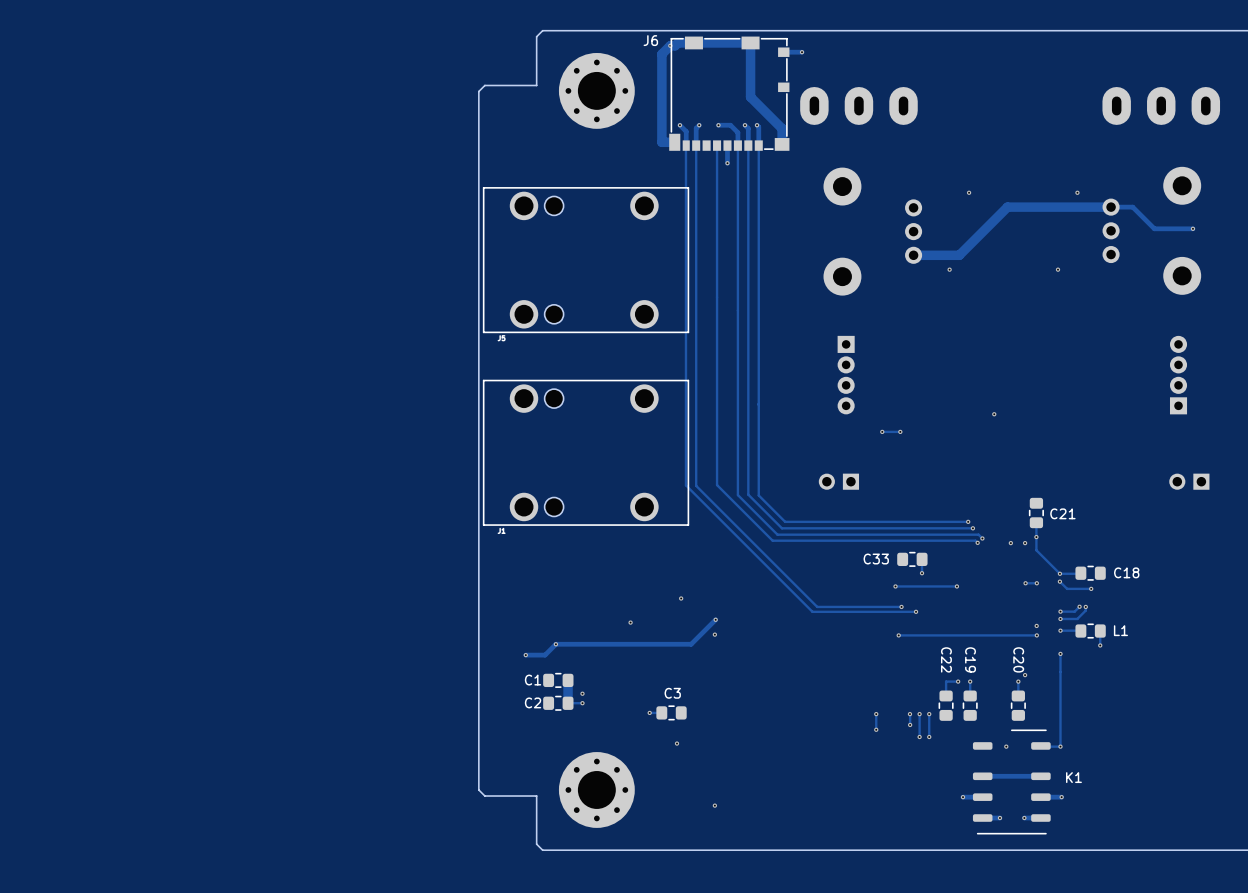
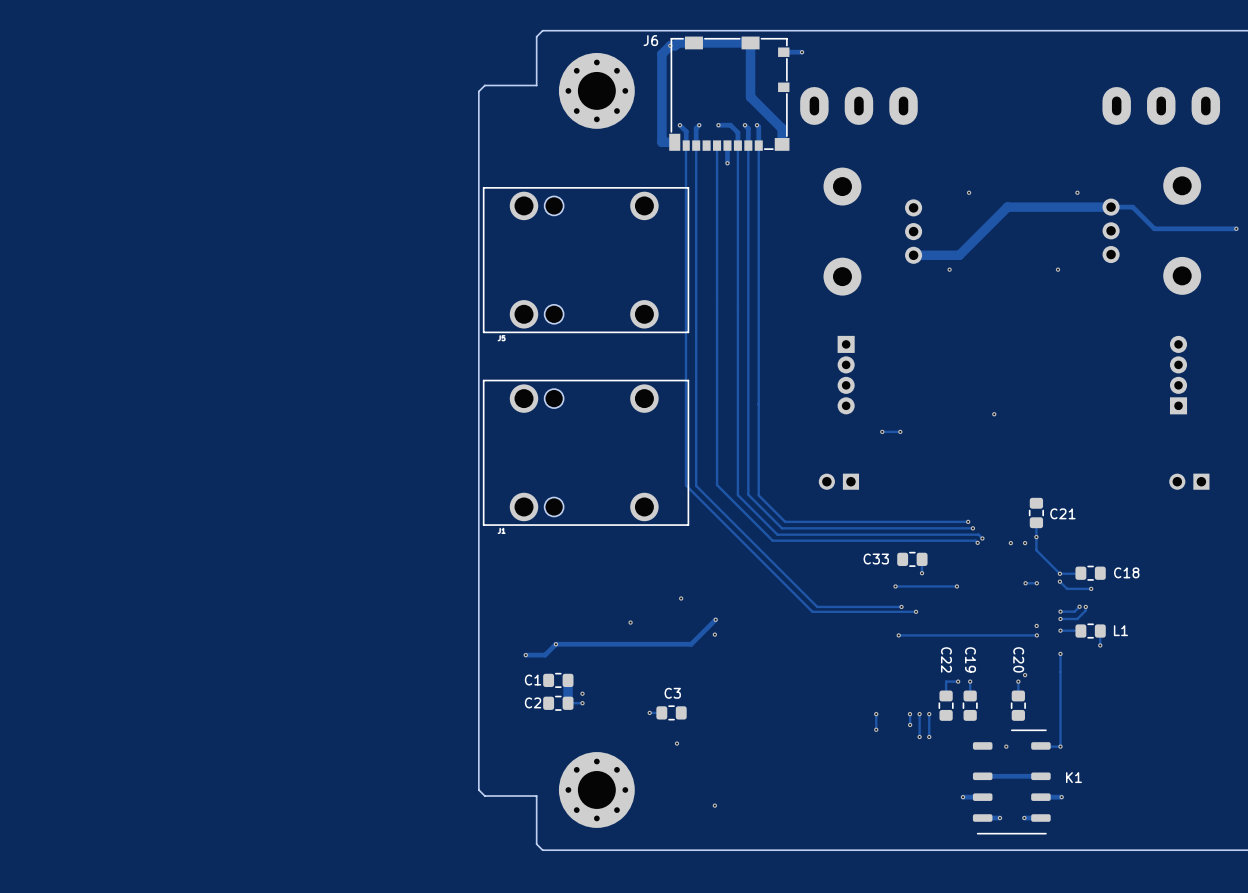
via position: (1192, 228) -> (1236, 228)
track: none -> (1236, 228) (1192, 228)

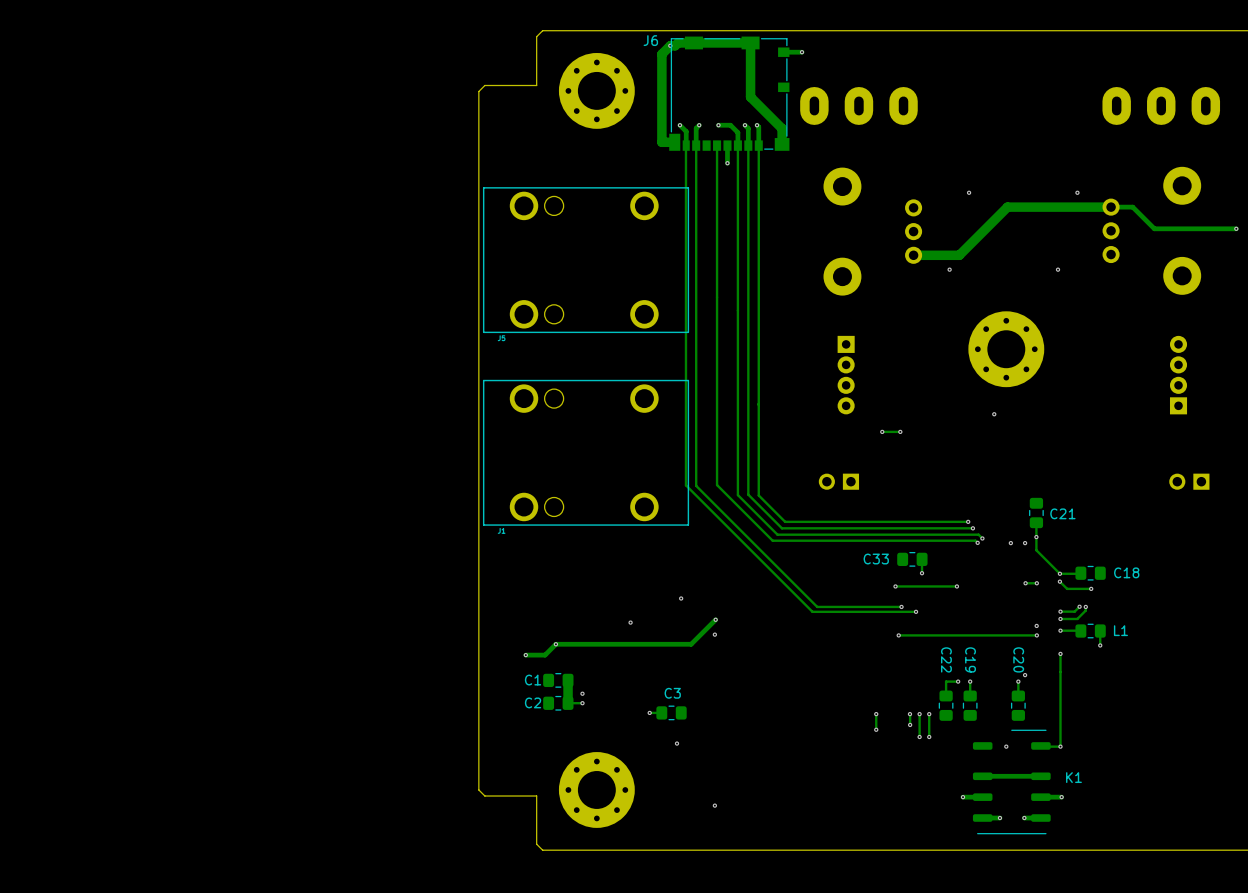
part: none -> (1006, 349)

